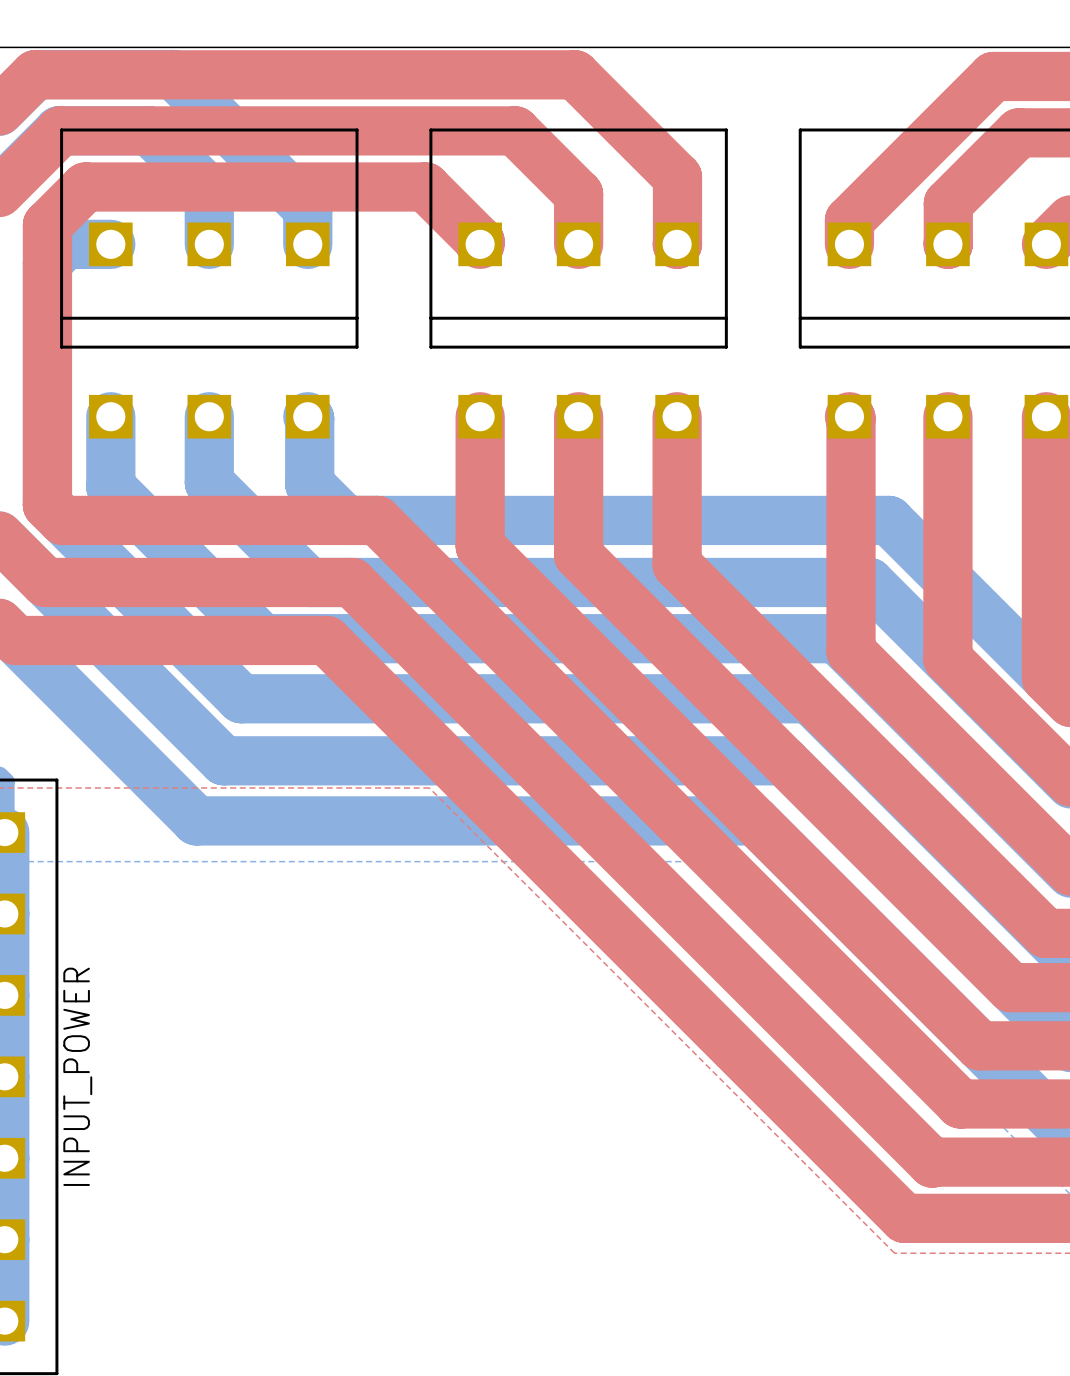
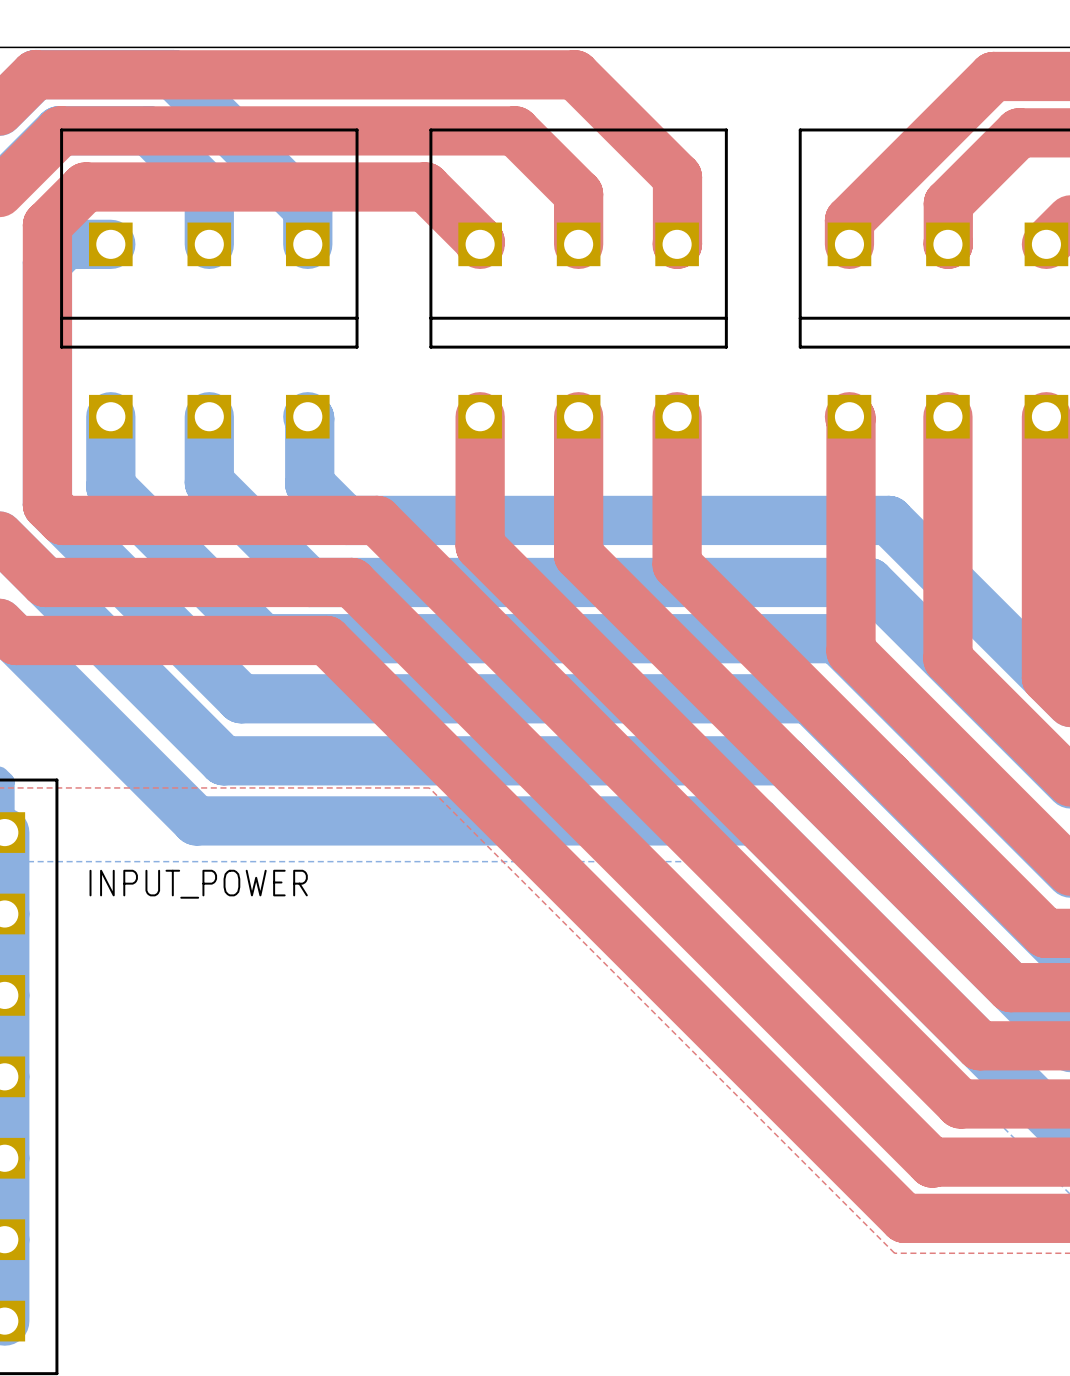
INPUT_POWER name rotation: 0° (77, 1076) -> 90° clockwise (198, 884)

